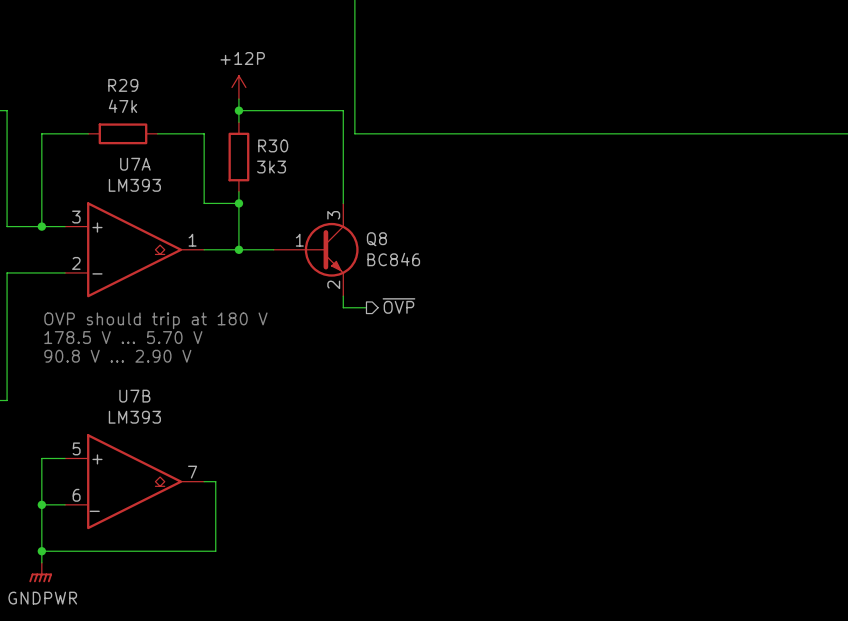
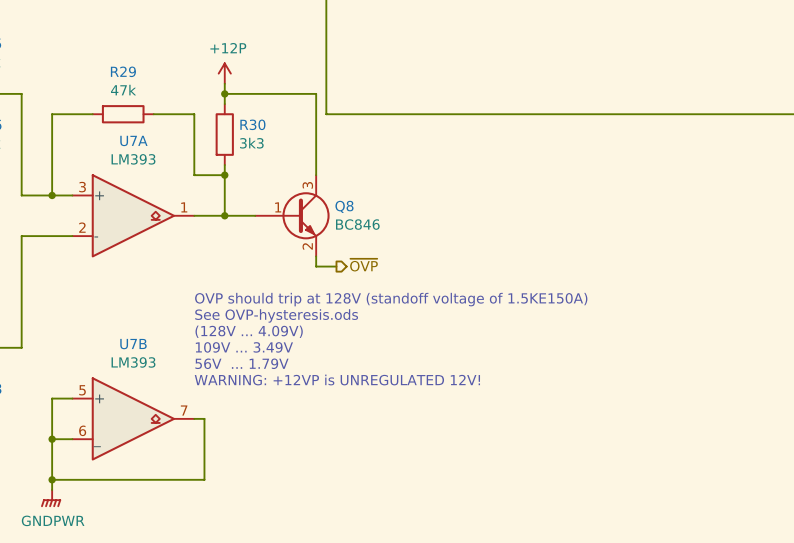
text: OVP should trip at 180 V (155, 320) -> none
text: 178.5 V ... 5.70 V (123, 337) -> none
text: none -> OVP should trip at 128V (standoff voltage of 1.5KE150A) (391, 299)
text: 90.8 V ... 2.90 V (117, 356) -> none
text: none -> See OVP-hysteresis.ods (276, 315)
text: none -> (128V ... 4.09V) (249, 331)
text: none -> 109V ... 3.49V (244, 347)
text: none -> 56V ... 1.79V (241, 363)
text: none -> WARNING: +12VP is UNREGULATED 12V! (337, 379)

